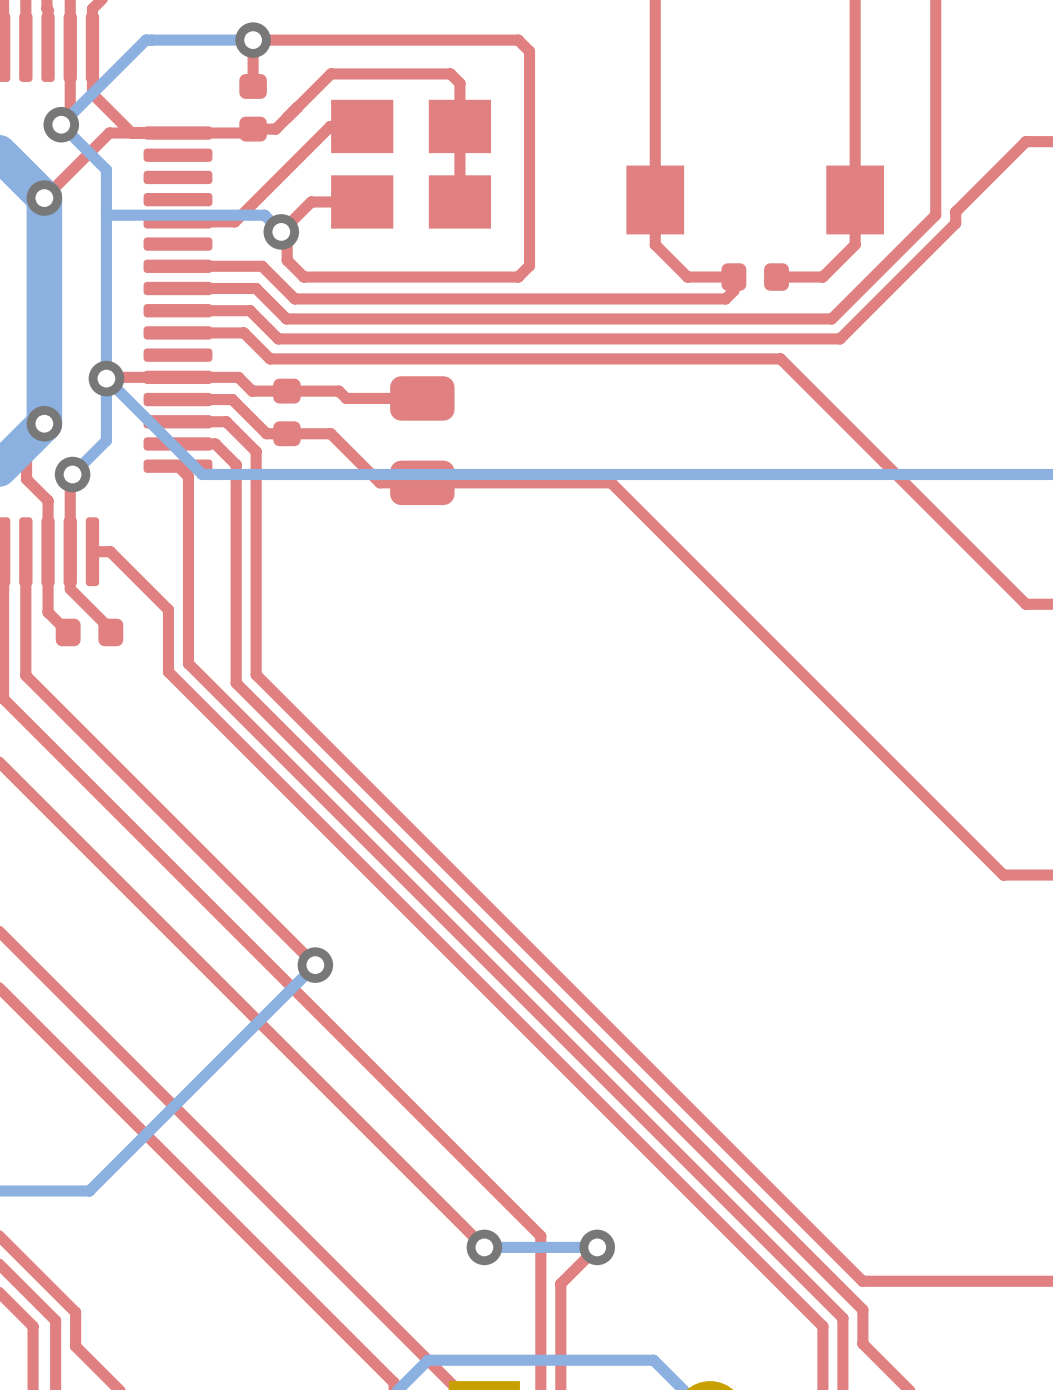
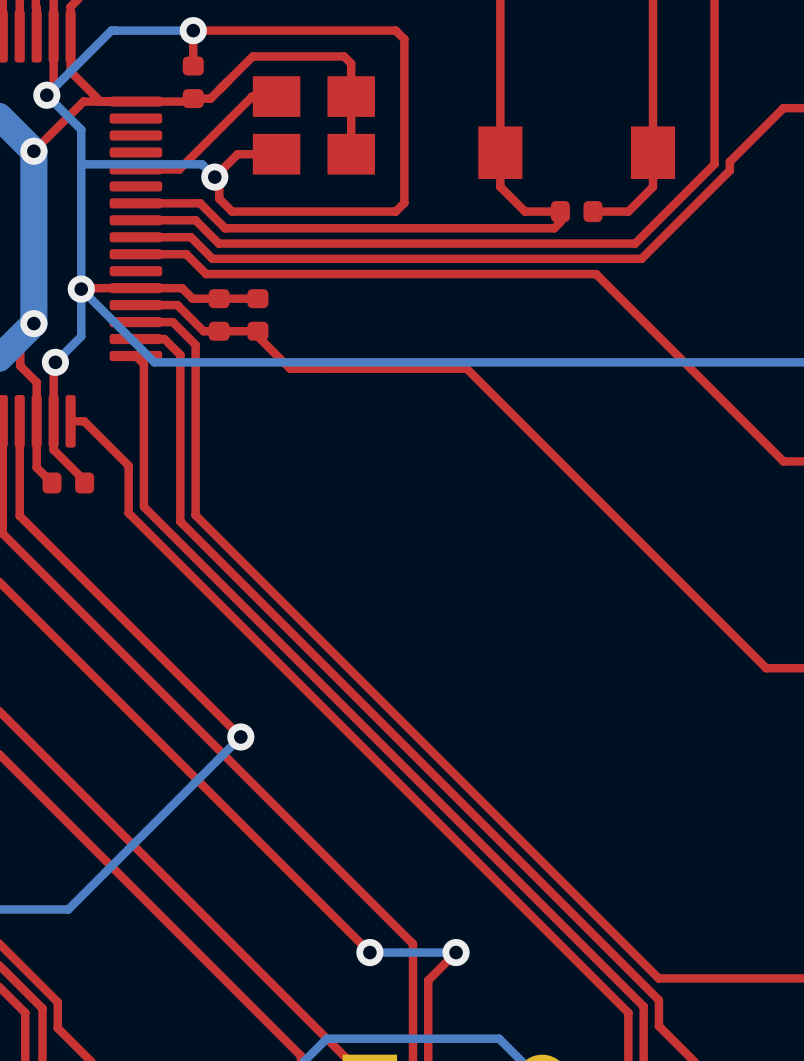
top track: (337, 391) (346, 398) (422, 398) -> none
part: none -> (257, 314)
part: (422, 440) -> none

